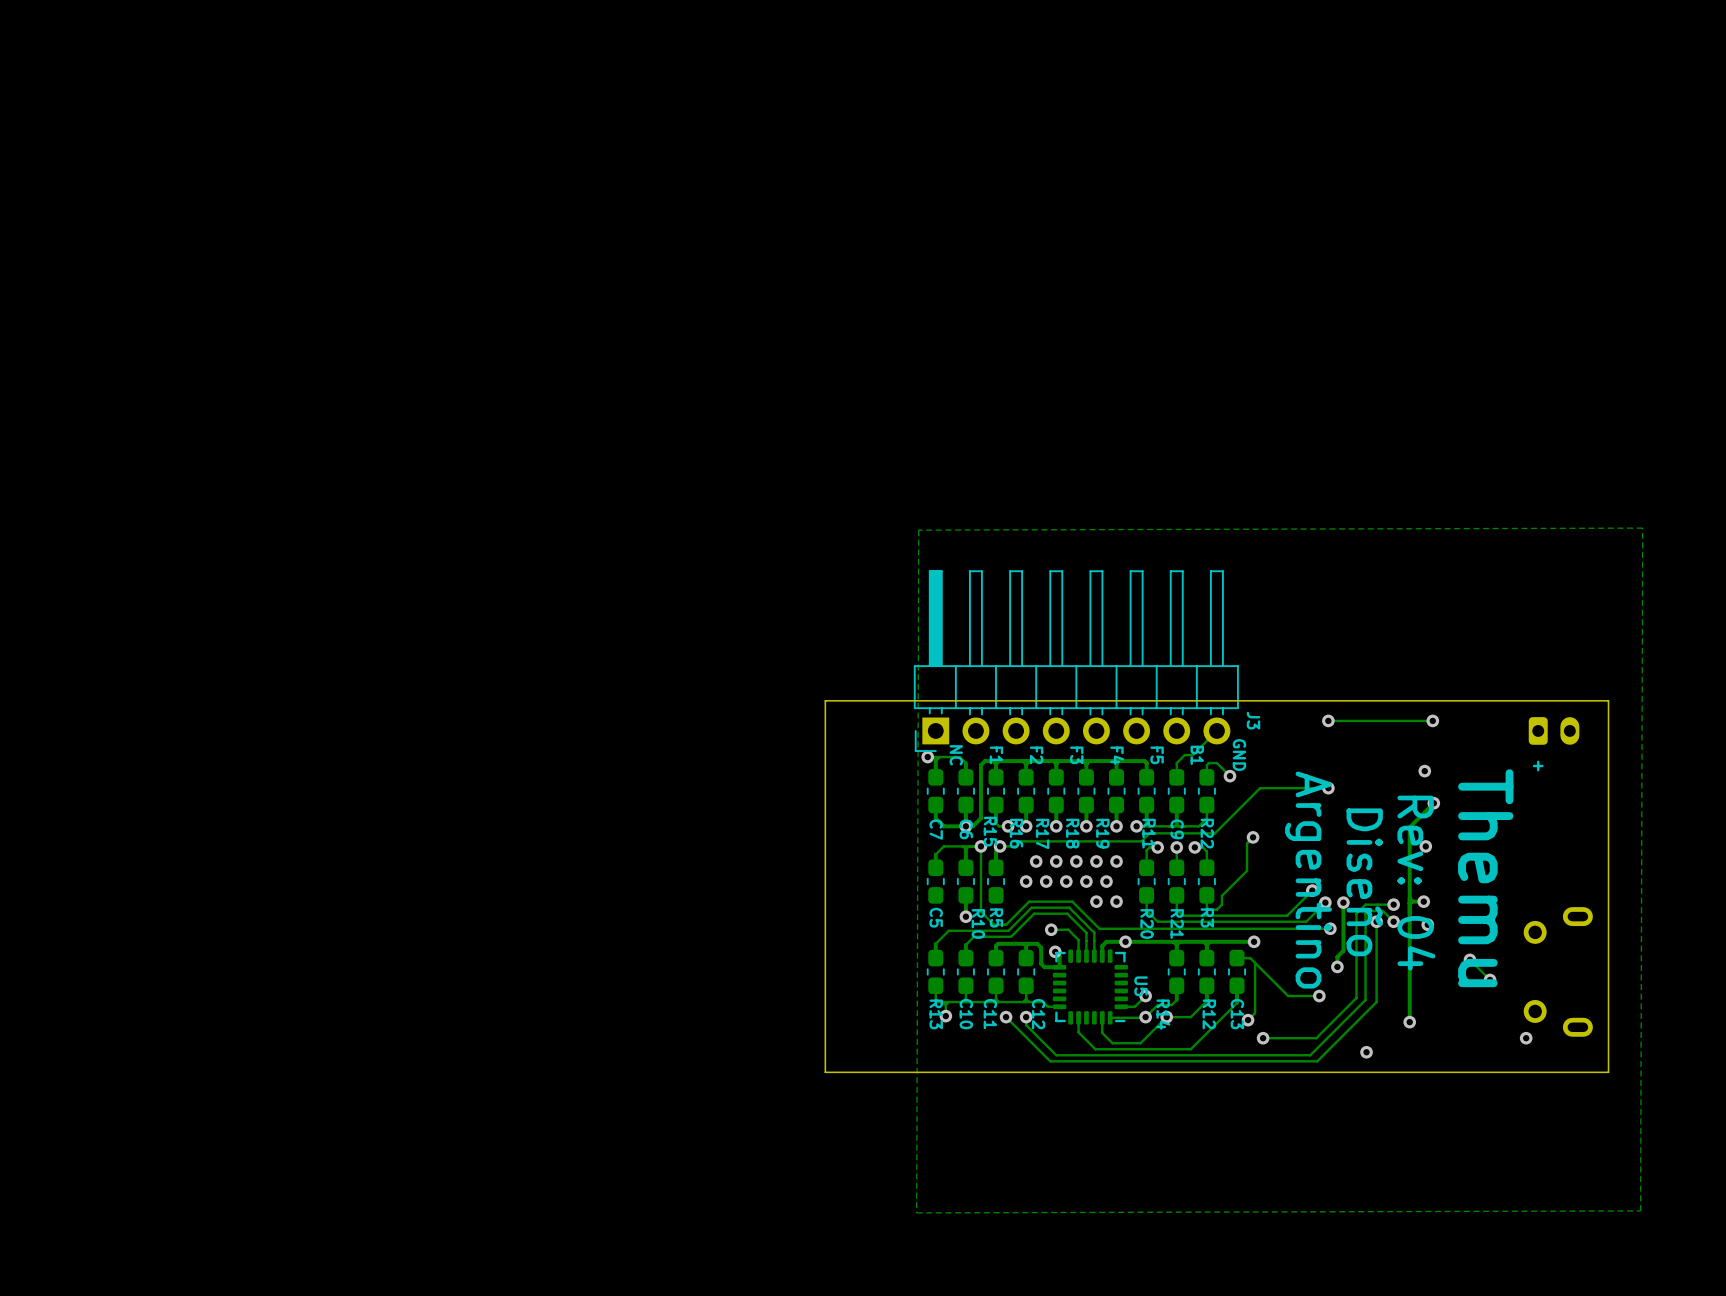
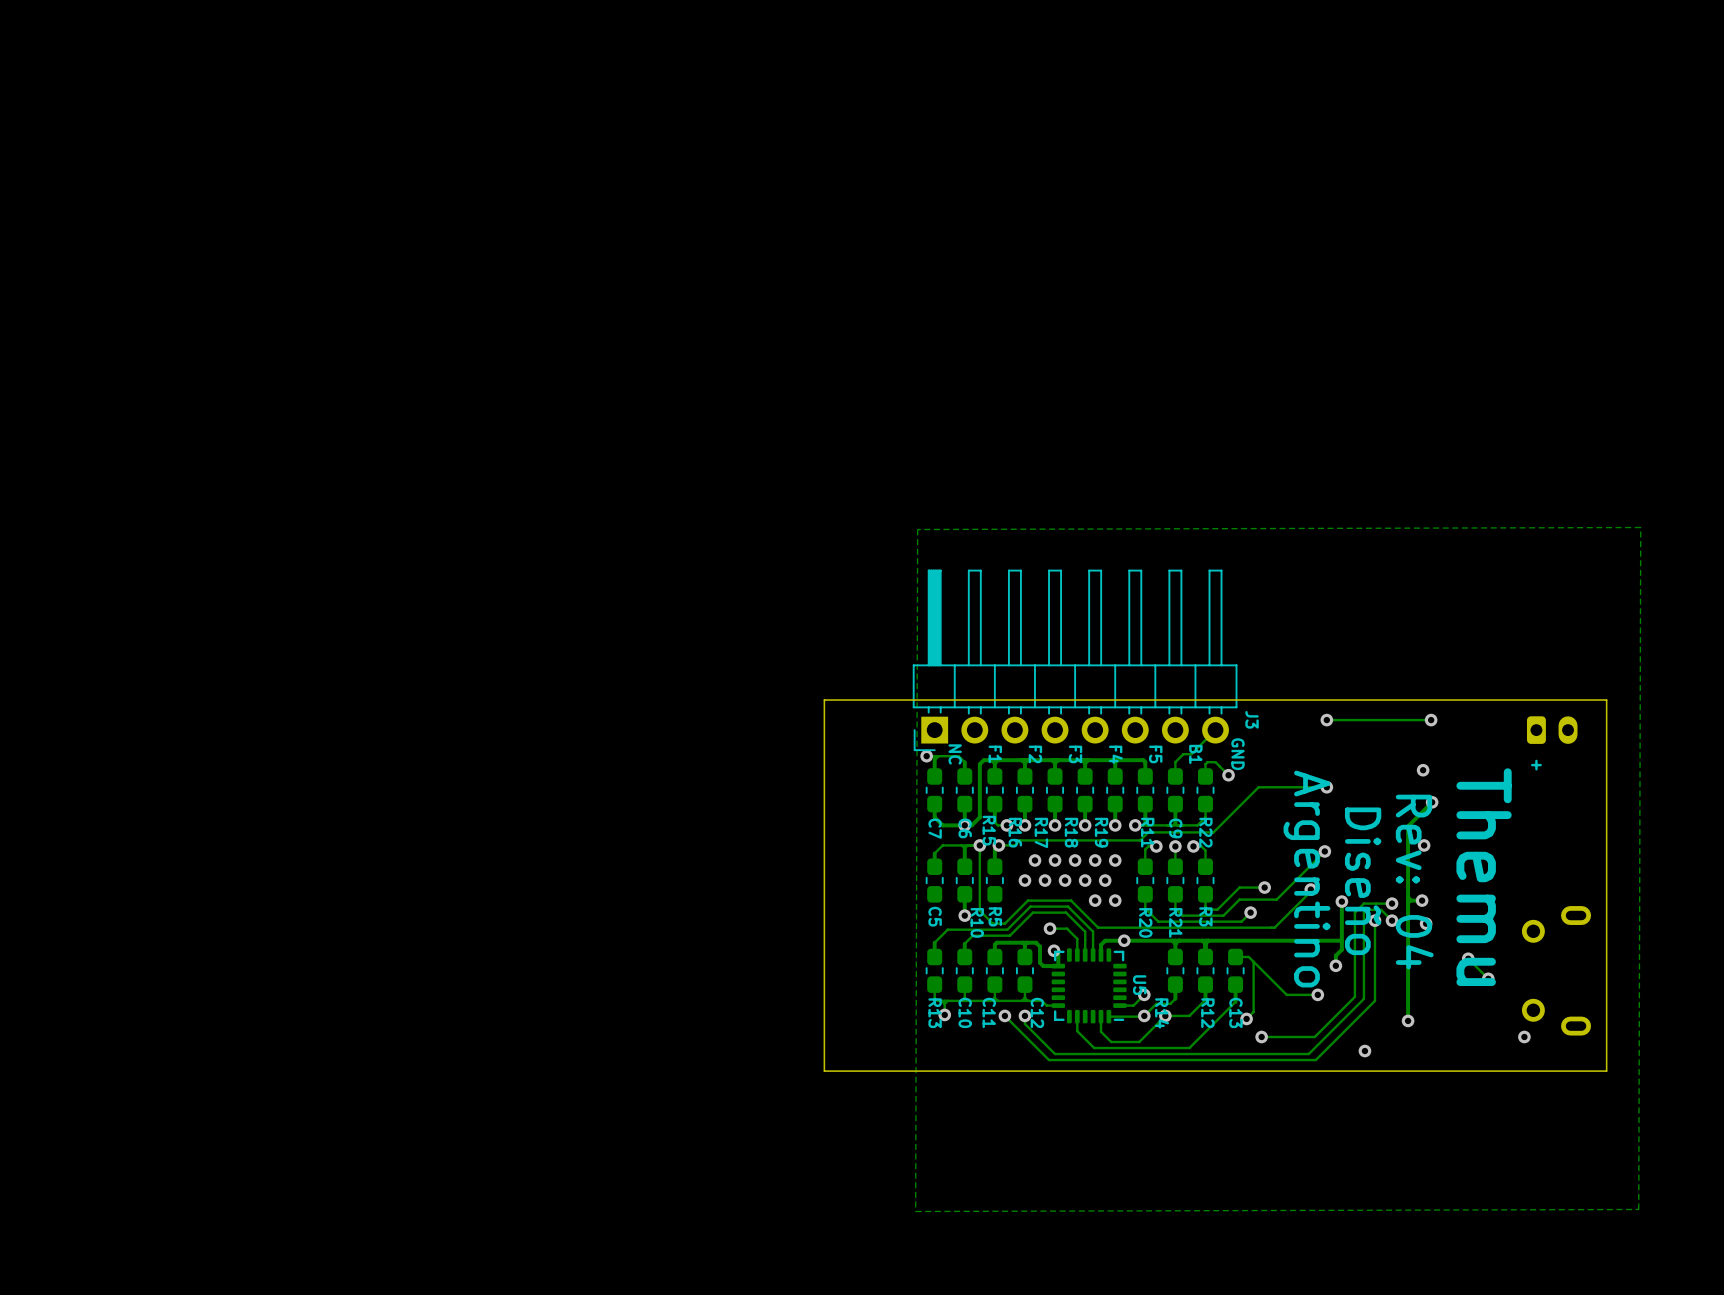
track: (1253, 837) (1247, 843) (1247, 870) (1221, 895) (1221, 904) (1216, 909) (1208, 909) -> (1264, 887) (1239, 887) (1217, 909) (1207, 908)
via: (1253, 837) -> none
via: none -> (1324, 851)
via: none -> (1264, 887)
track: (1312, 890) (1287, 915) (1182, 915) -> (1324, 851) (1276, 899) (1239, 899) (1223, 915) (1181, 914)
track: (1325, 902) (1306, 921) (1157, 921) (1146, 909) -> (1250, 912) (1241, 921) (1158, 921) (1145, 908)
via: (1325, 902) -> none
via: none -> (1250, 912)
track: (1330, 928) (1276, 928) -> (1307, 894) (1274, 927)
via: (1330, 928) -> none
via: (1254, 941) -> none
track: none -> (1341, 940) (1252, 940)

